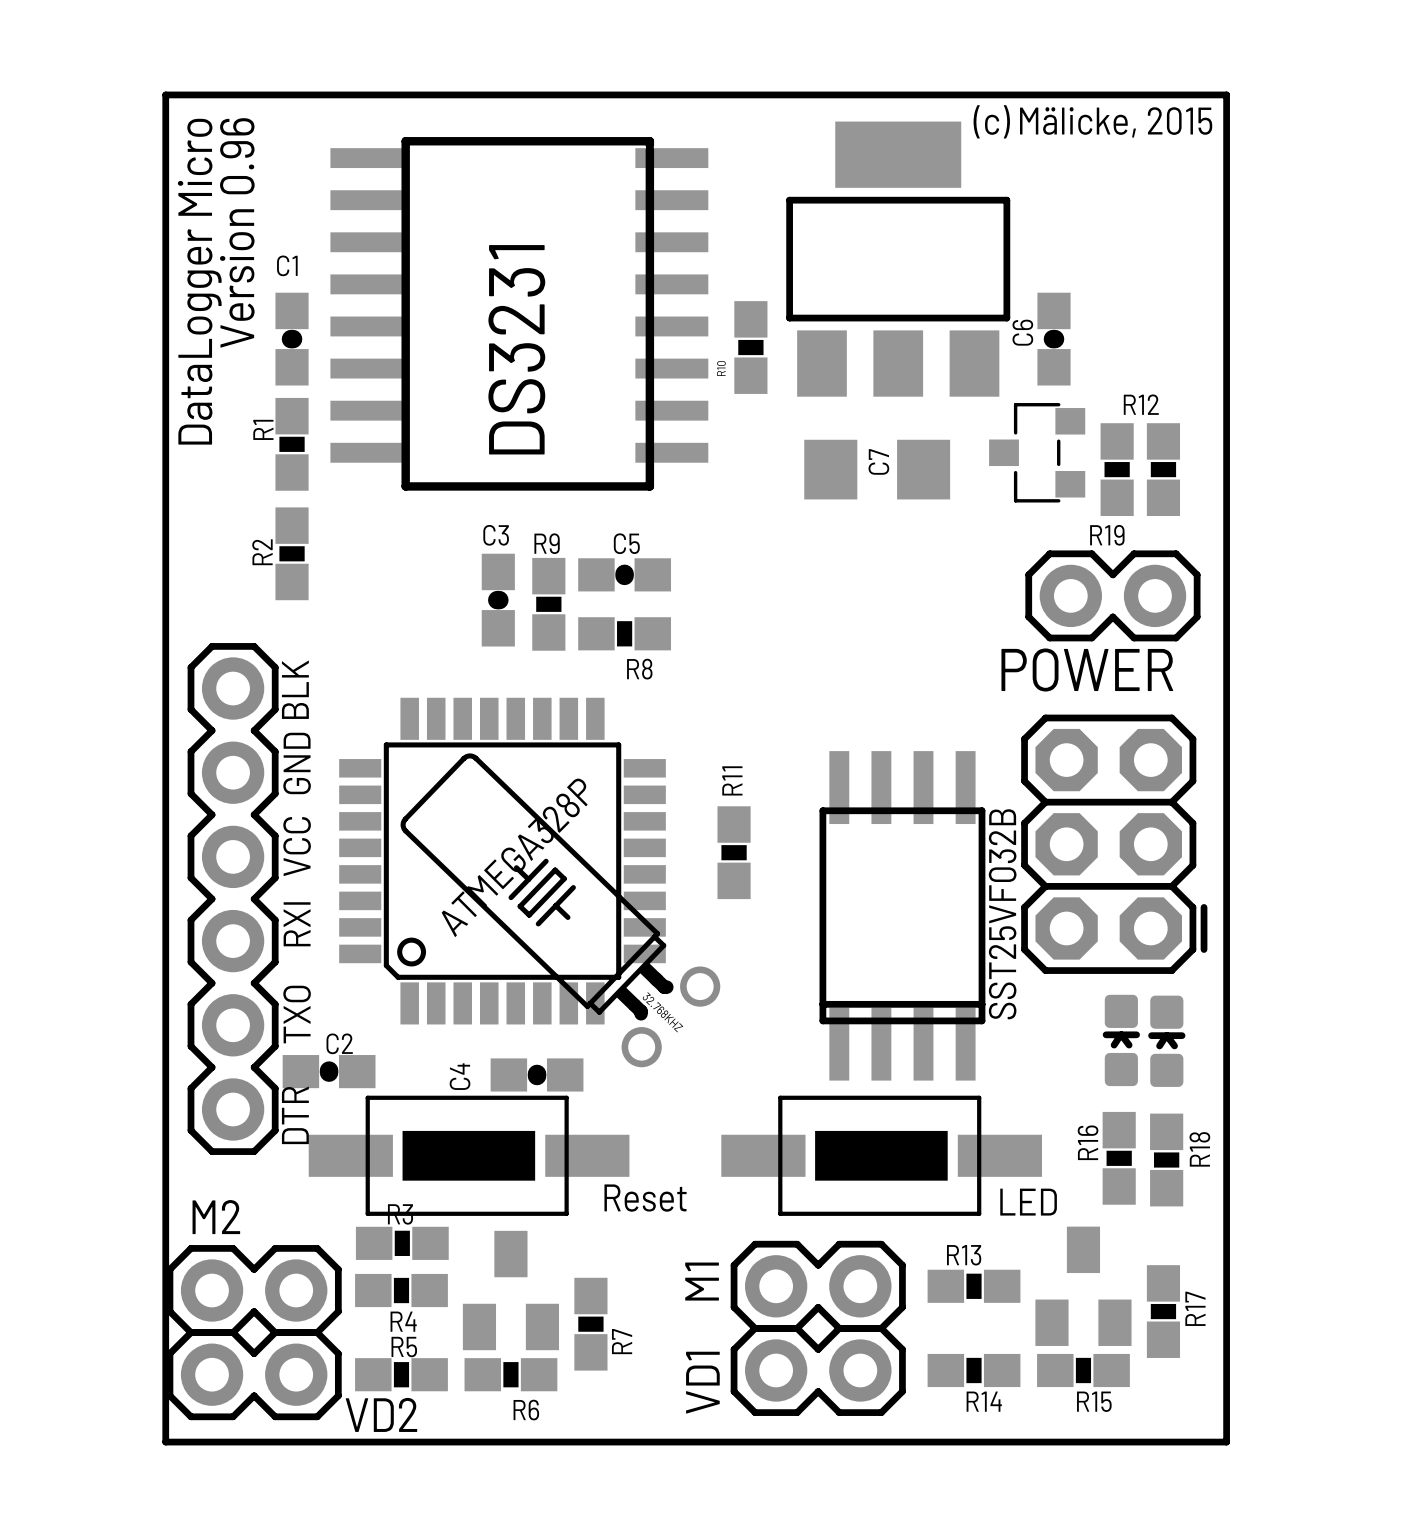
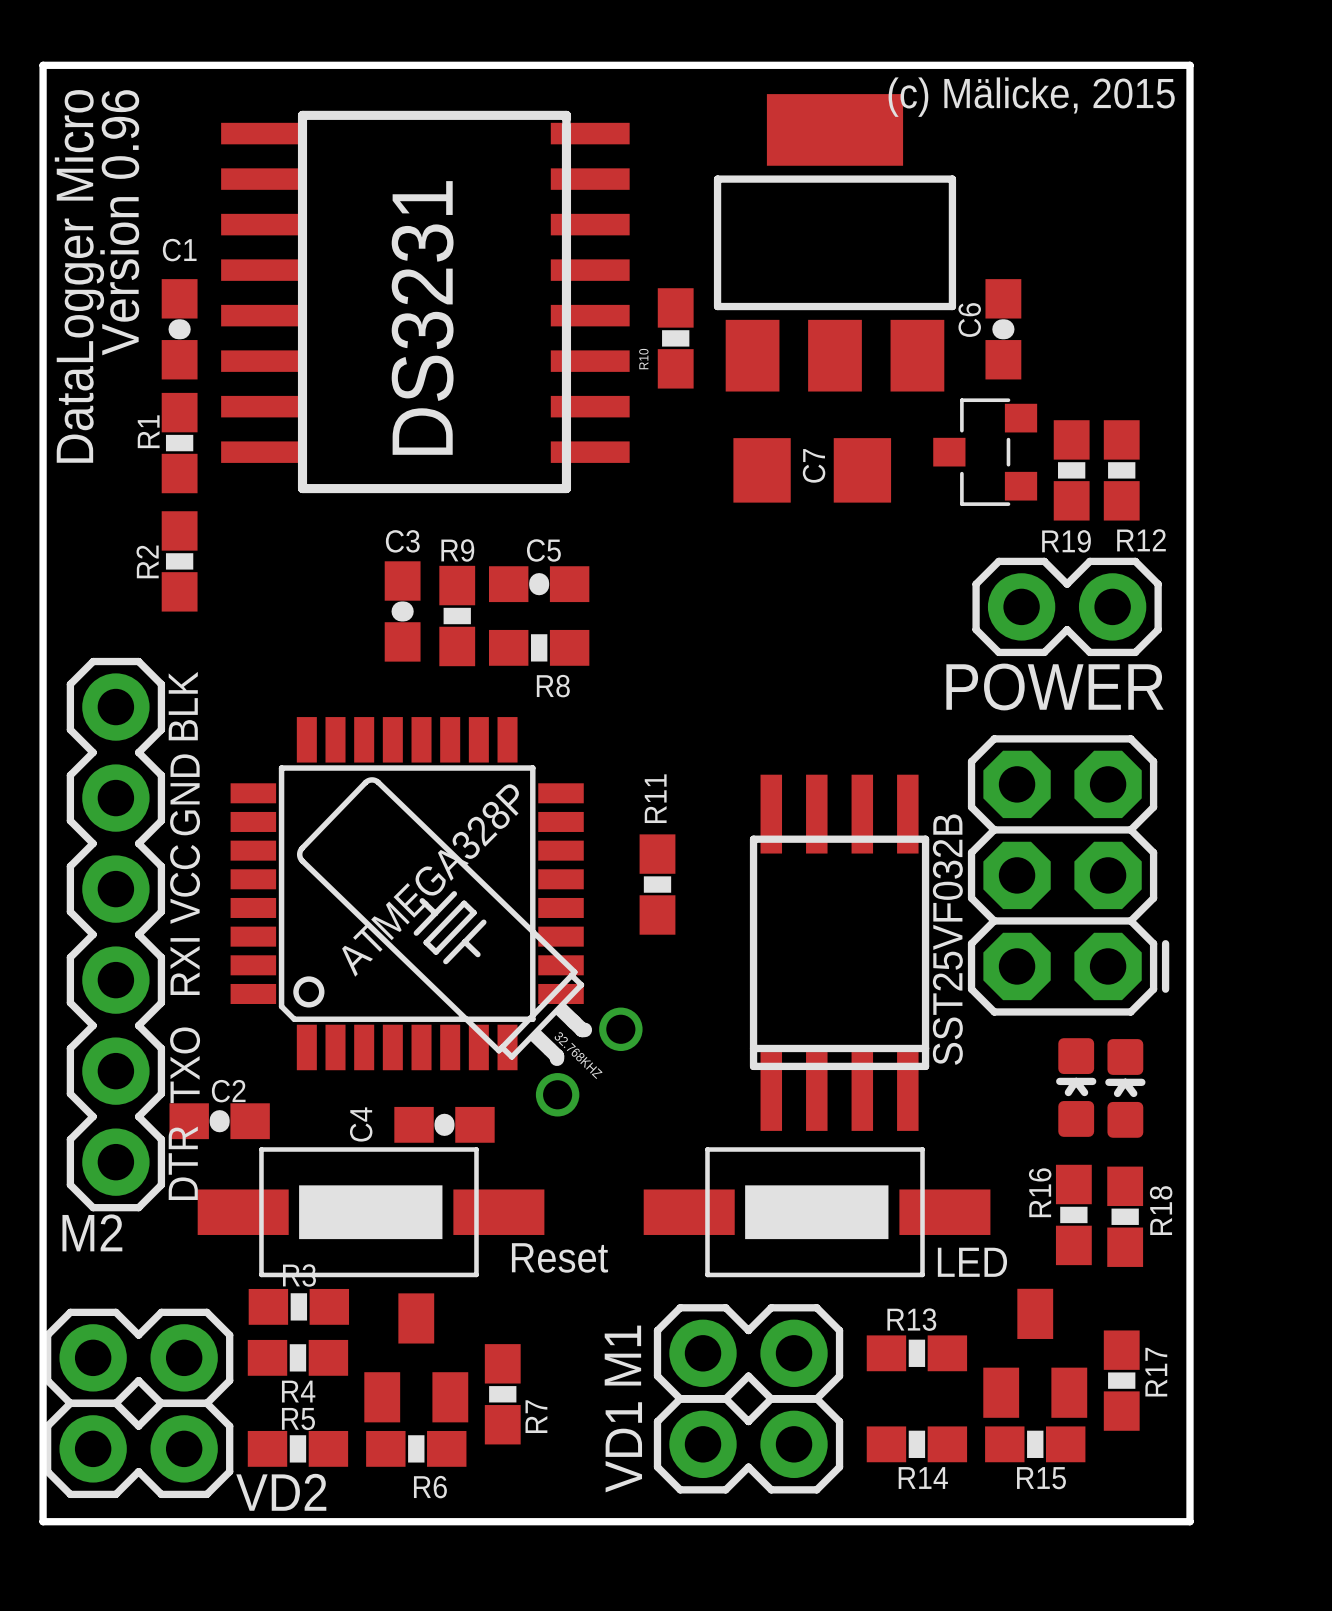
R12 name position: R12 (1141, 404) -> R12 (1141, 540)
M2 name position: M2 (216, 1217) -> M2 (92, 1232)

